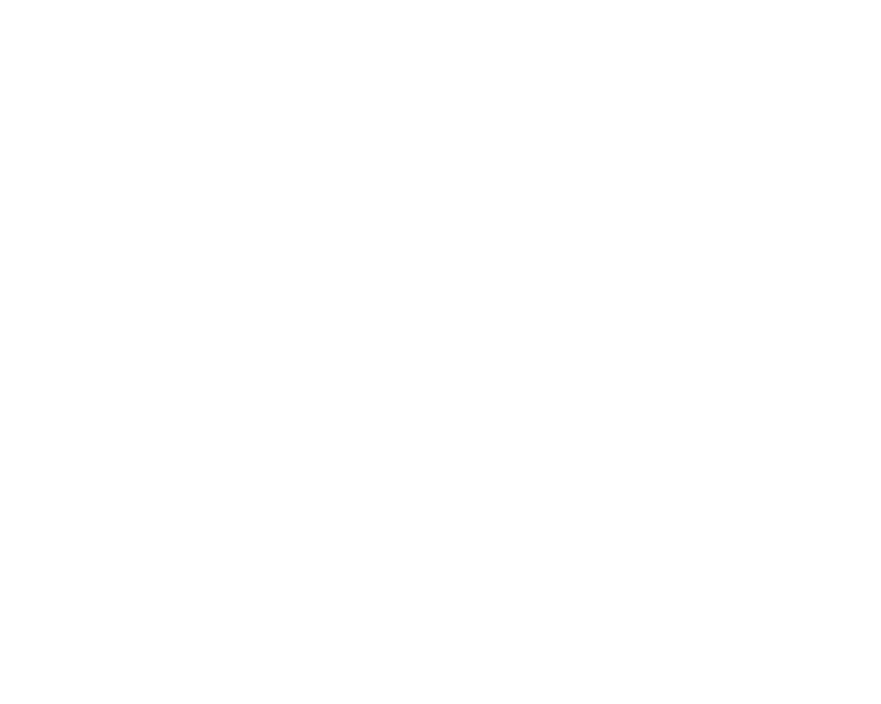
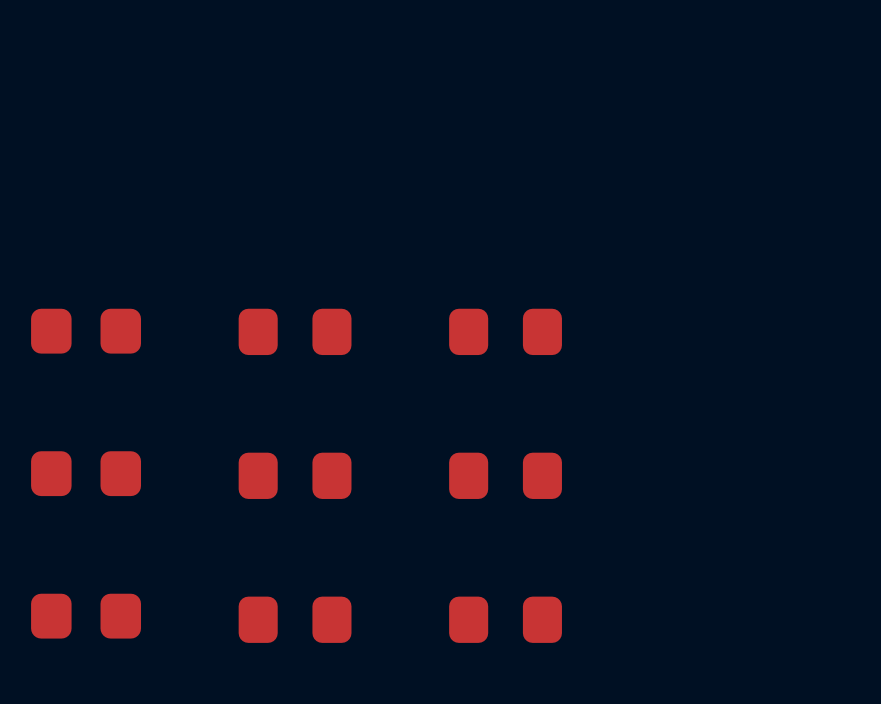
part: none -> (86, 331)
part: none -> (295, 331)
part: none -> (505, 331)
part: none -> (86, 473)
part: none -> (295, 475)
part: none -> (505, 475)
part: none -> (86, 616)
part: none -> (295, 619)
part: none -> (505, 619)

